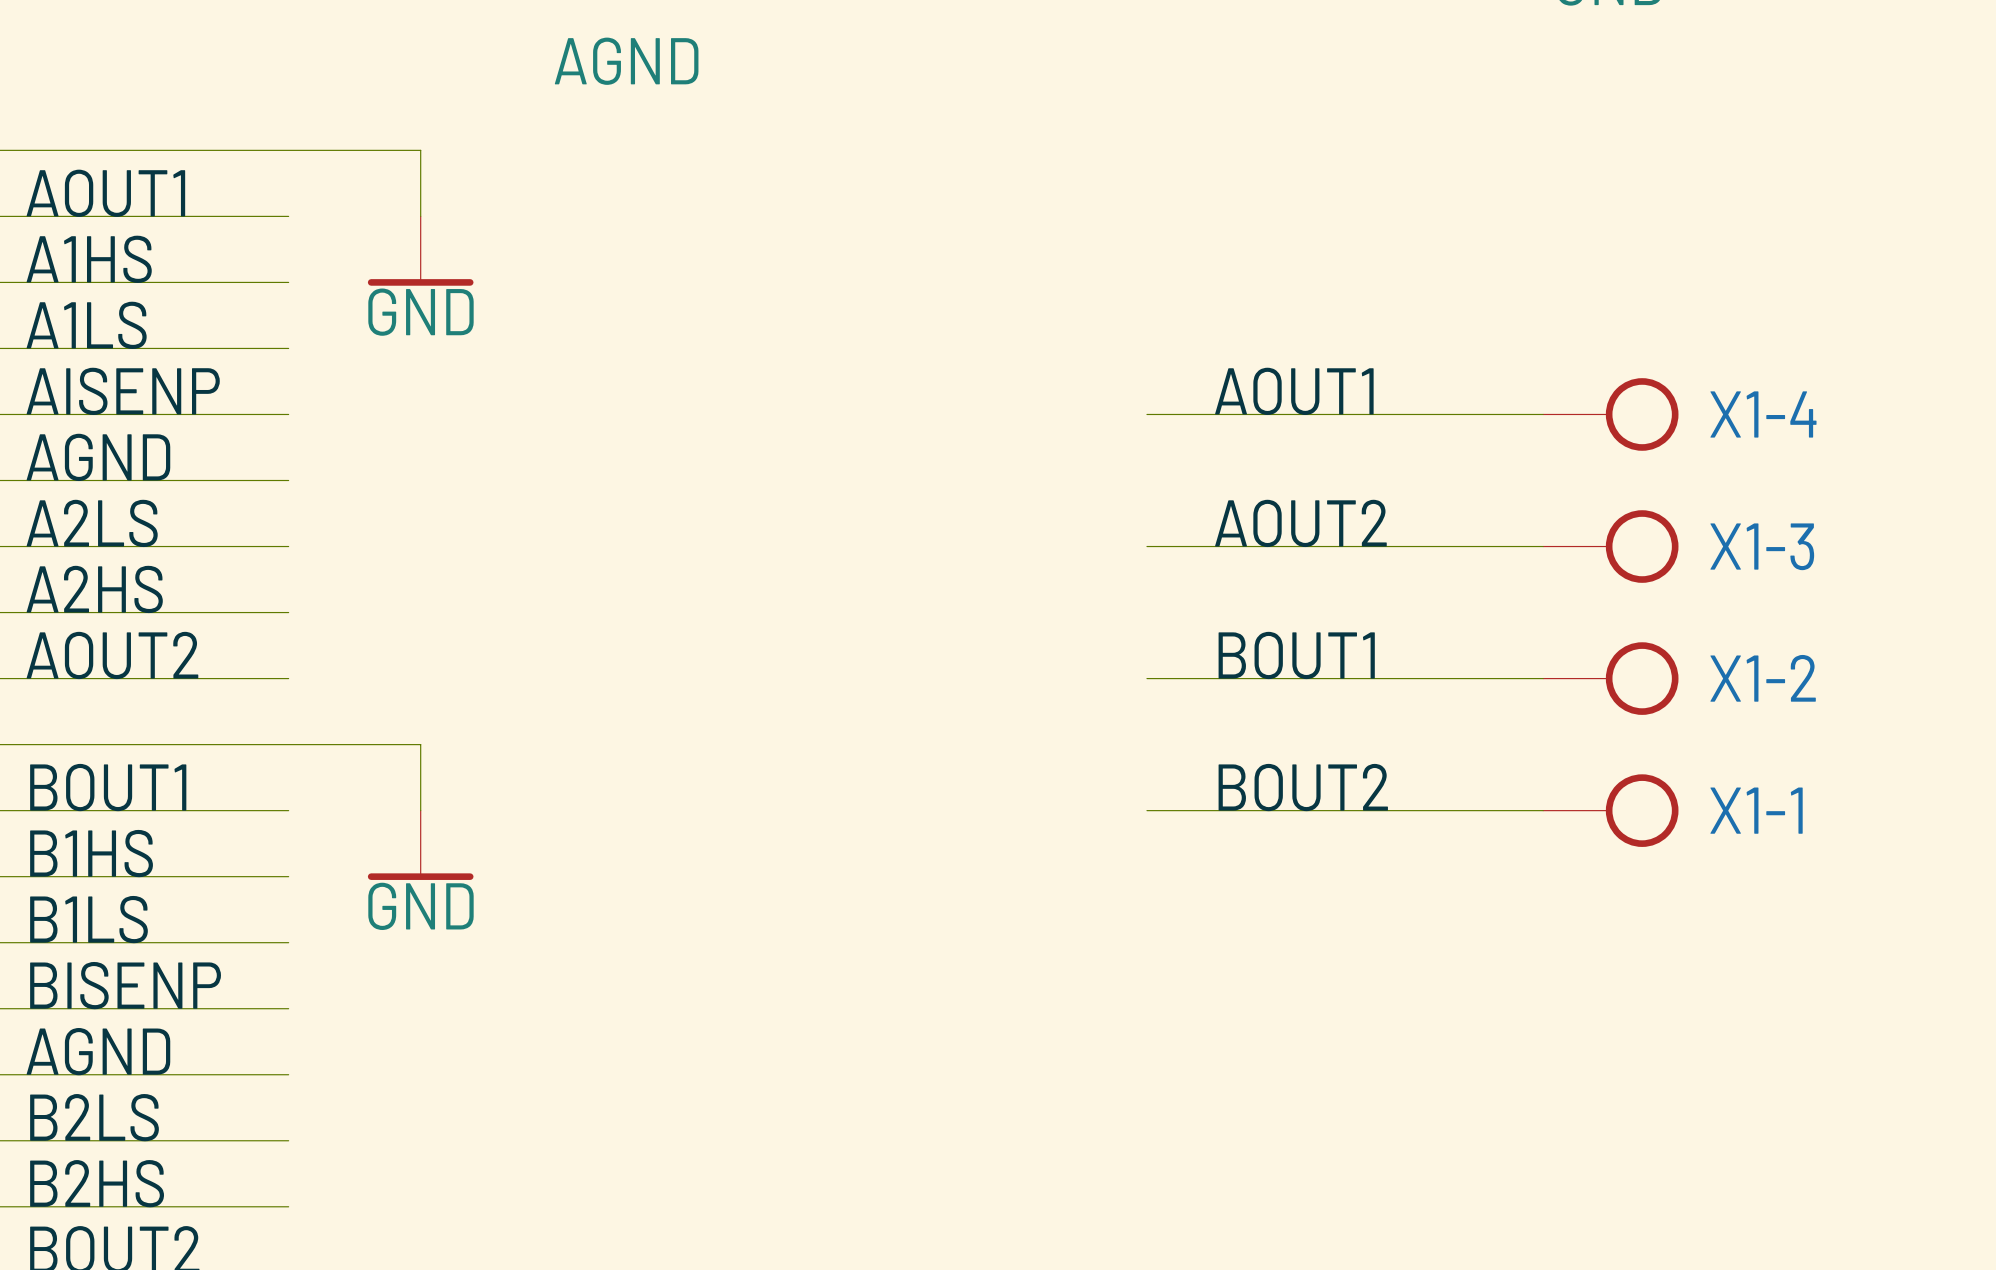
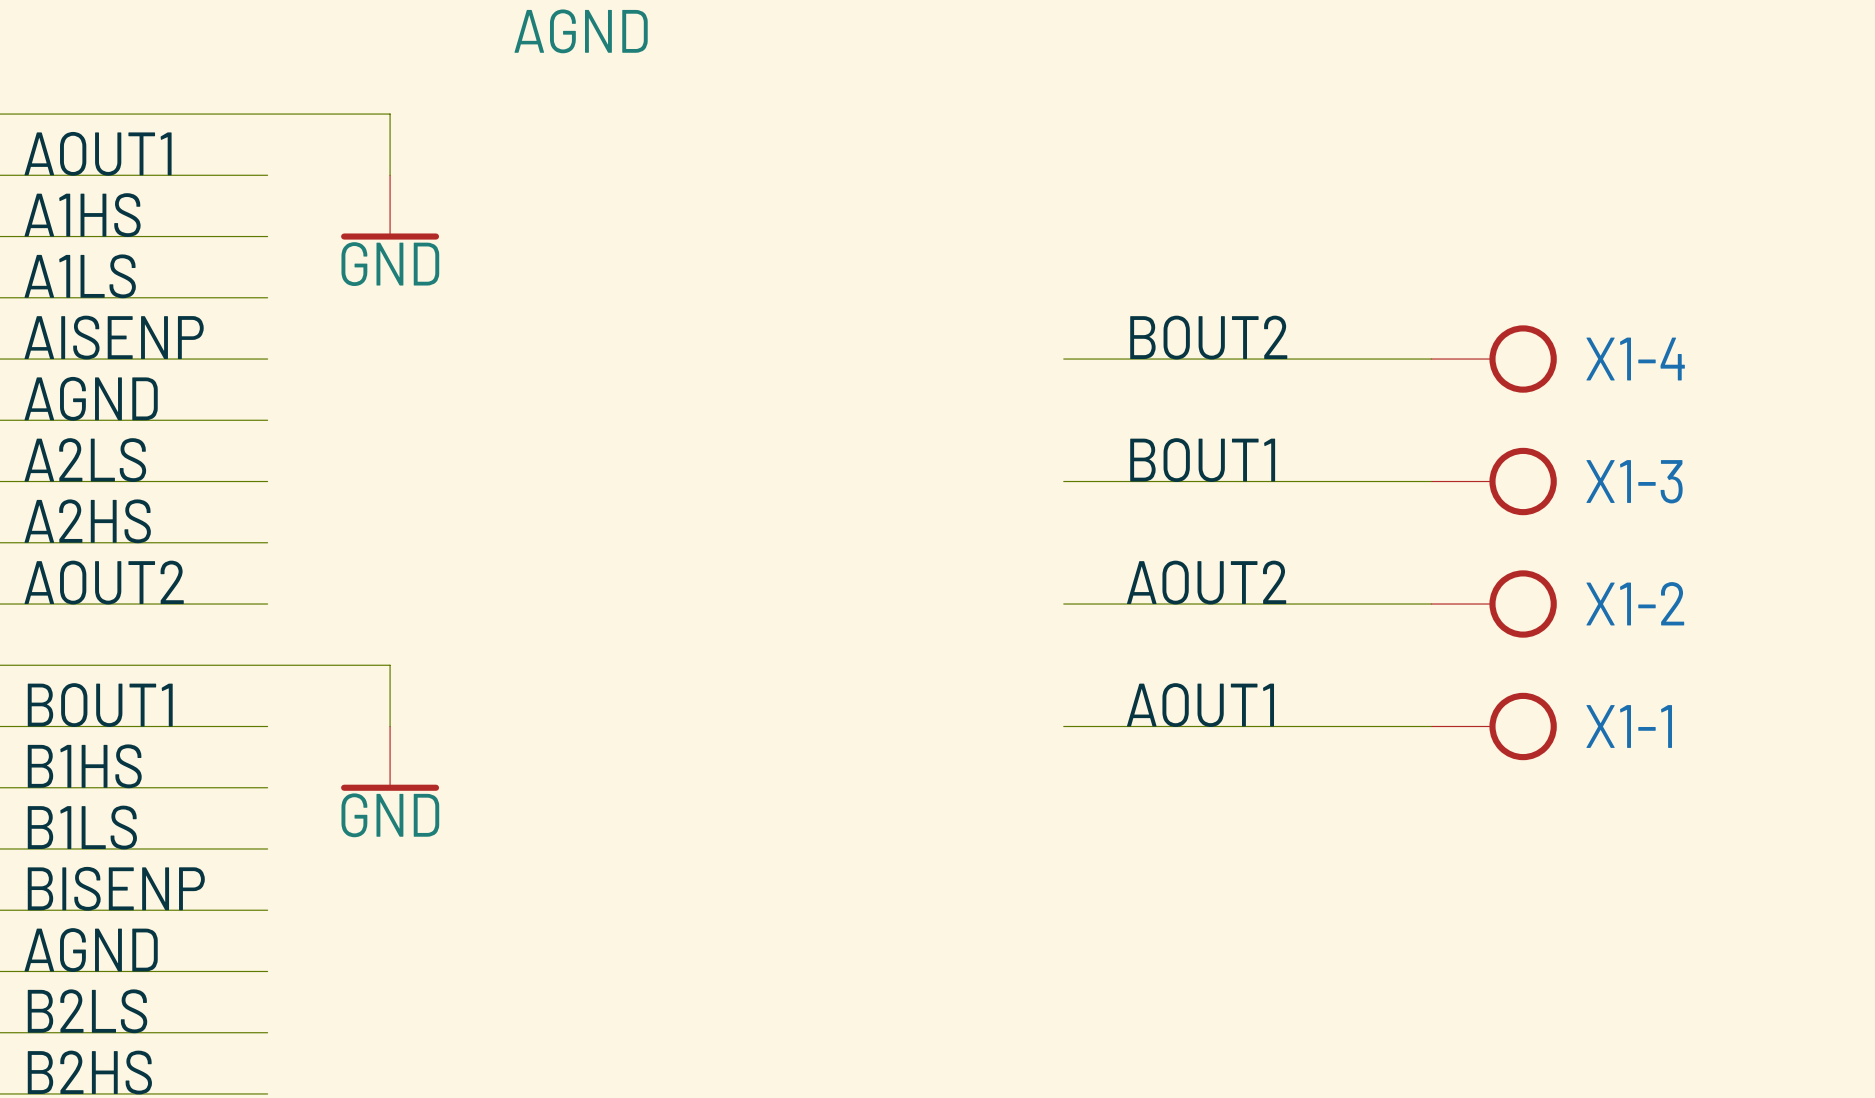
label: AOUT1 (1294, 391) -> BOUT2 (1208, 337)
label: AOUT2 (1300, 523) -> BOUT1 (1202, 460)
label: BOUT1 (1296, 655) -> AOUT2 (1206, 582)
label: BOUT2 (1303, 787) -> AOUT1 (1200, 705)

